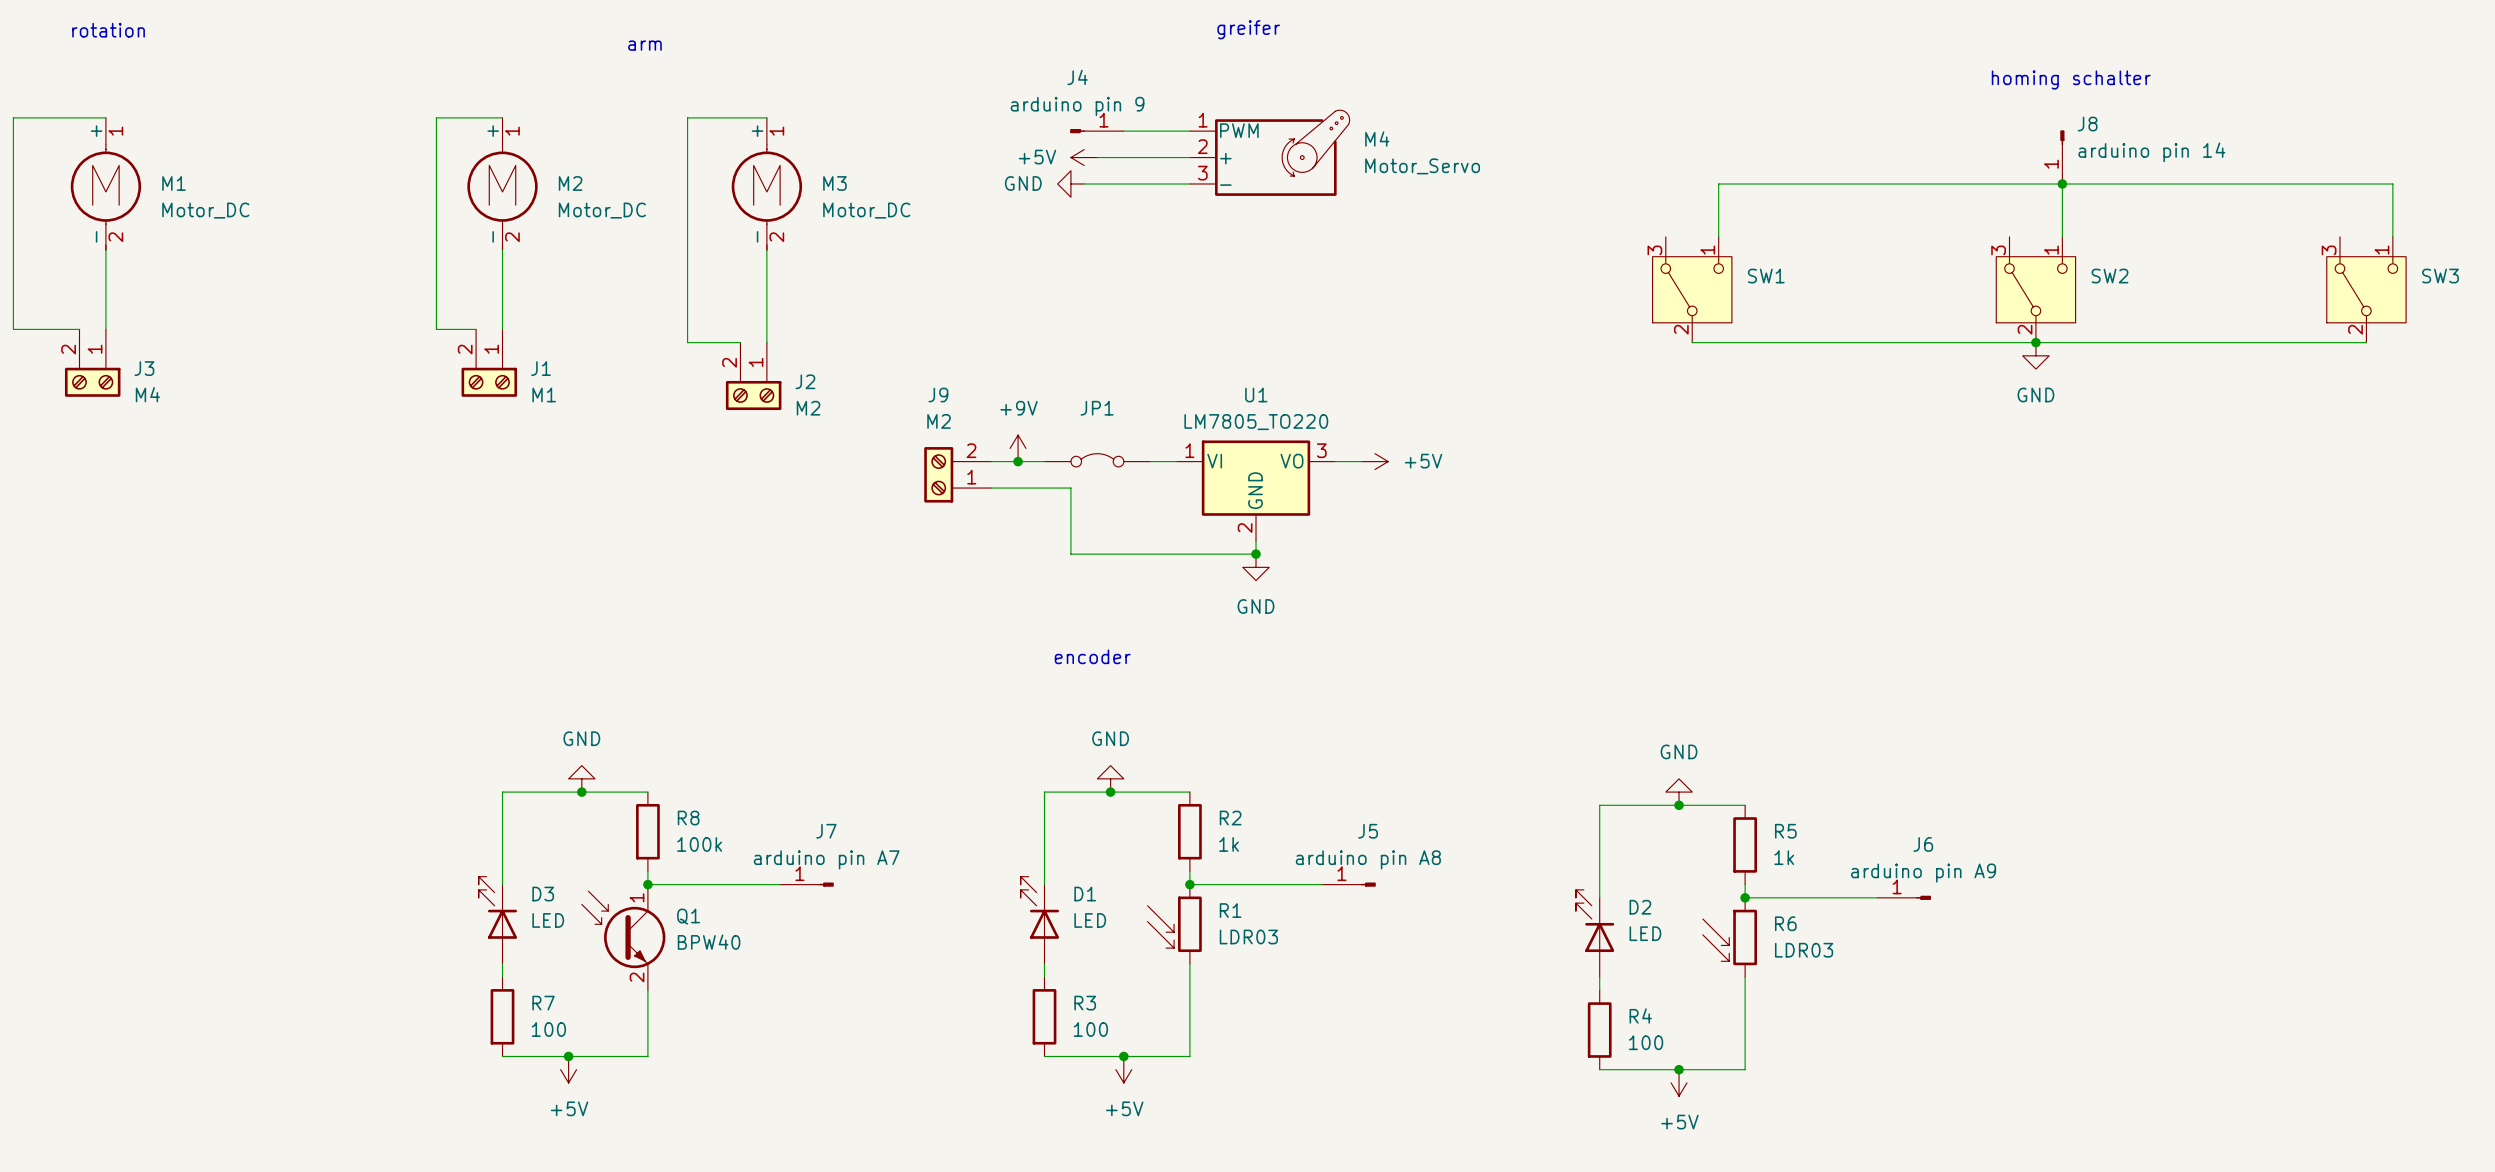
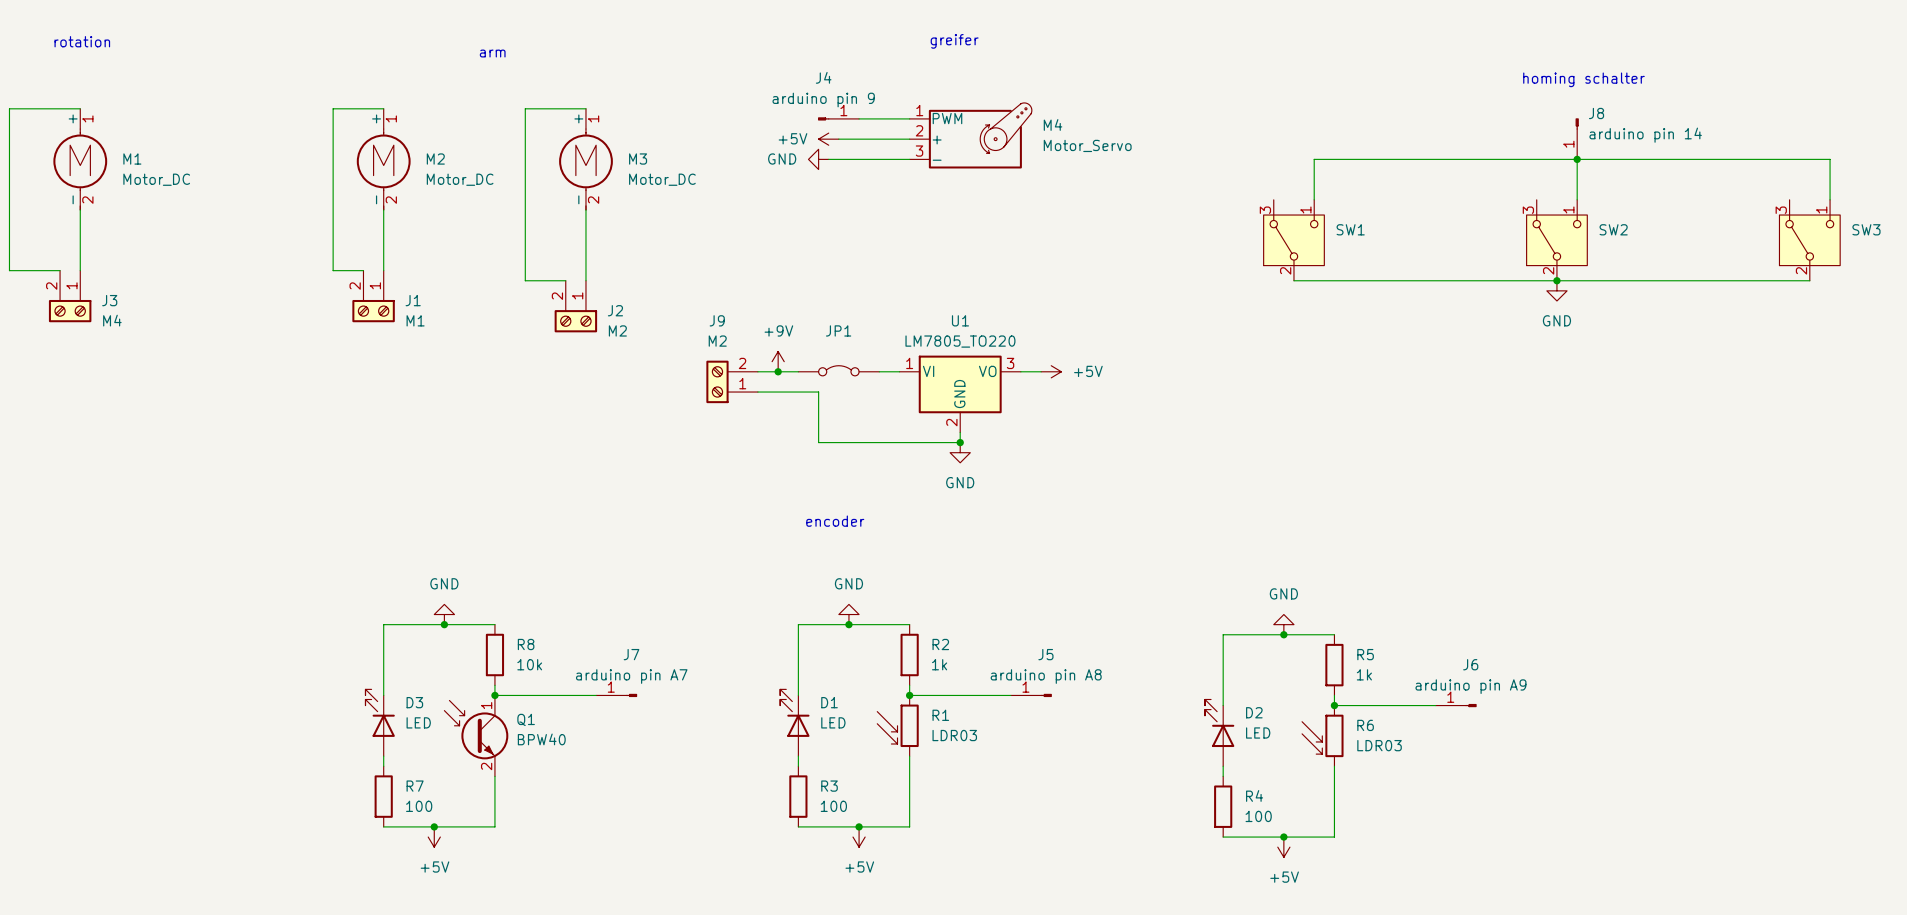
R8 value: 100k (699, 844) -> 10k (529, 664)

